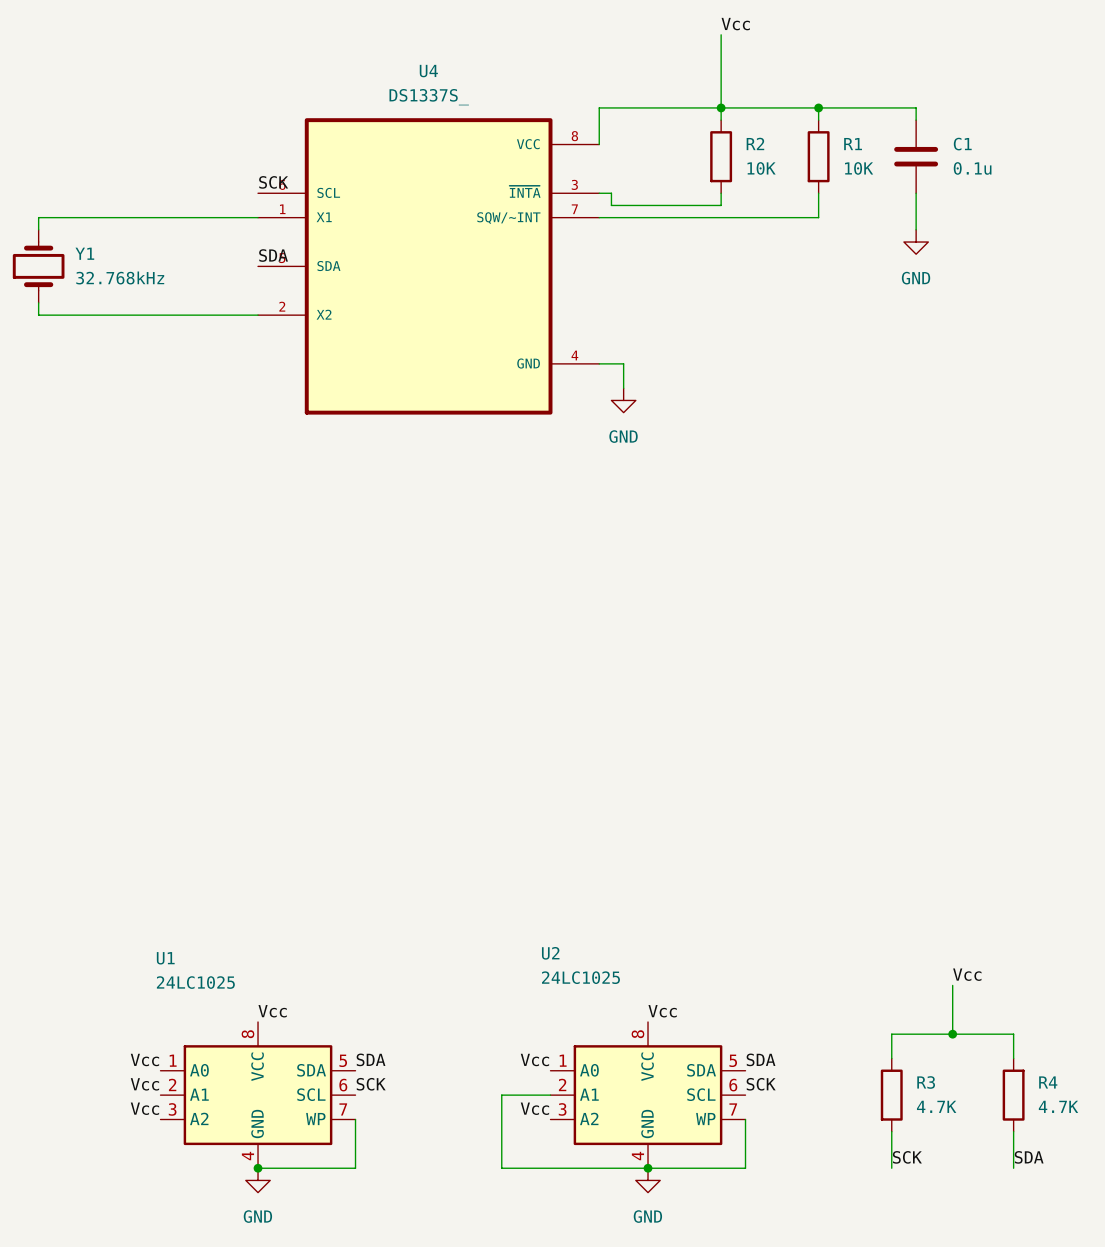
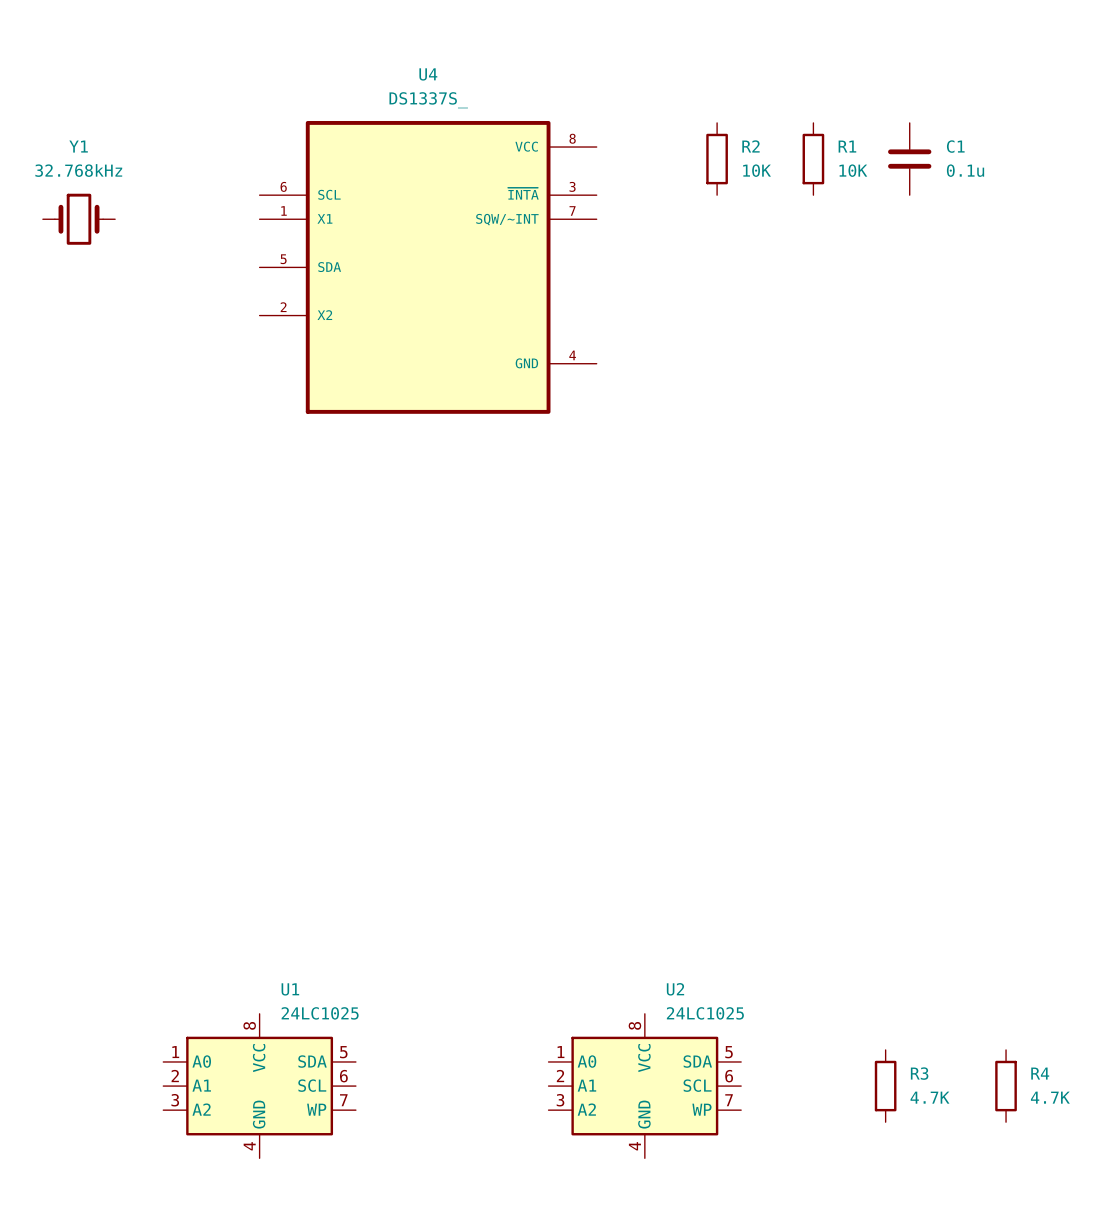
label: Vcc (735, 24) -> none
wire: (721, 34) (721, 120) -> none
junction: (721, 107) -> none
wire: (818, 107) (818, 120) -> none
junction: (818, 107) -> none
wire: (916, 120) (916, 107) (599, 107) (599, 144) -> none
label: SCK (273, 182) -> none
wire: (599, 193) (611, 193) (611, 205) (721, 205) (721, 193) -> none
wire: (818, 193) (818, 217) (599, 217) -> none
wire: (916, 193) (916, 229) -> none
wire: (258, 217) (38, 217) (38, 229) -> none
power symbol: GND (916, 242) -> none
Y1 name position: Y1 (84, 253) -> Y1 (78, 146)
label: SDA (273, 255) -> none
Y1 rotation: 0° (38, 266) -> 90° clockwise (79, 219)
Y1 position: (38, 266) -> (79, 219)
Y1 value position: 32.768kHz (120, 277) -> 32.768kHz (78, 170)
wire: (38, 302) (38, 315) (258, 315) -> none
wire: (599, 363) (623, 363) (623, 388) -> none
power symbol: GND (623, 400) -> none
U2 name position: U2 (550, 953) -> U2 (675, 989)
U1 name position: U1 (165, 958) -> U1 (290, 989)
label: Vcc (967, 974) -> none
U2 value position: 24LC1025 (580, 977) -> 24LC1025 (705, 1013)
U1 value position: 24LC1025 (195, 982) -> 24LC1025 (320, 1013)
wire: (952, 985) (952, 1034) -> none
label: Vcc (272, 1011) -> none
label: Vcc (662, 1011) -> none
junction: (952, 1034) -> none
wire: (891, 1058) (891, 1034) (1013, 1034) (1013, 1058) -> none
label: Vcc (144, 1059) -> none
label: SDA (371, 1059) -> none
label: Vcc (534, 1059) -> none
label: SDA (761, 1059) -> none
label: Vcc (144, 1084) -> none
label: SCK (371, 1084) -> none
label: SCK (761, 1084) -> none
wire: (550, 1095) (501, 1095) (501, 1168) (745, 1168) (745, 1119) -> none
label: Vcc (144, 1108) -> none
label: Vcc (534, 1108) -> none
wire: (355, 1119) (355, 1168) (258, 1168) -> none
wire: (891, 1131) (891, 1168) -> none
wire: (1013, 1131) (1013, 1168) -> none
label: SCK (907, 1157) -> none
label: SDA (1029, 1157) -> none
junction: (258, 1168) -> none
junction: (648, 1168) -> none
power symbol: GND (258, 1180) -> none
power symbol: GND (648, 1180) -> none

